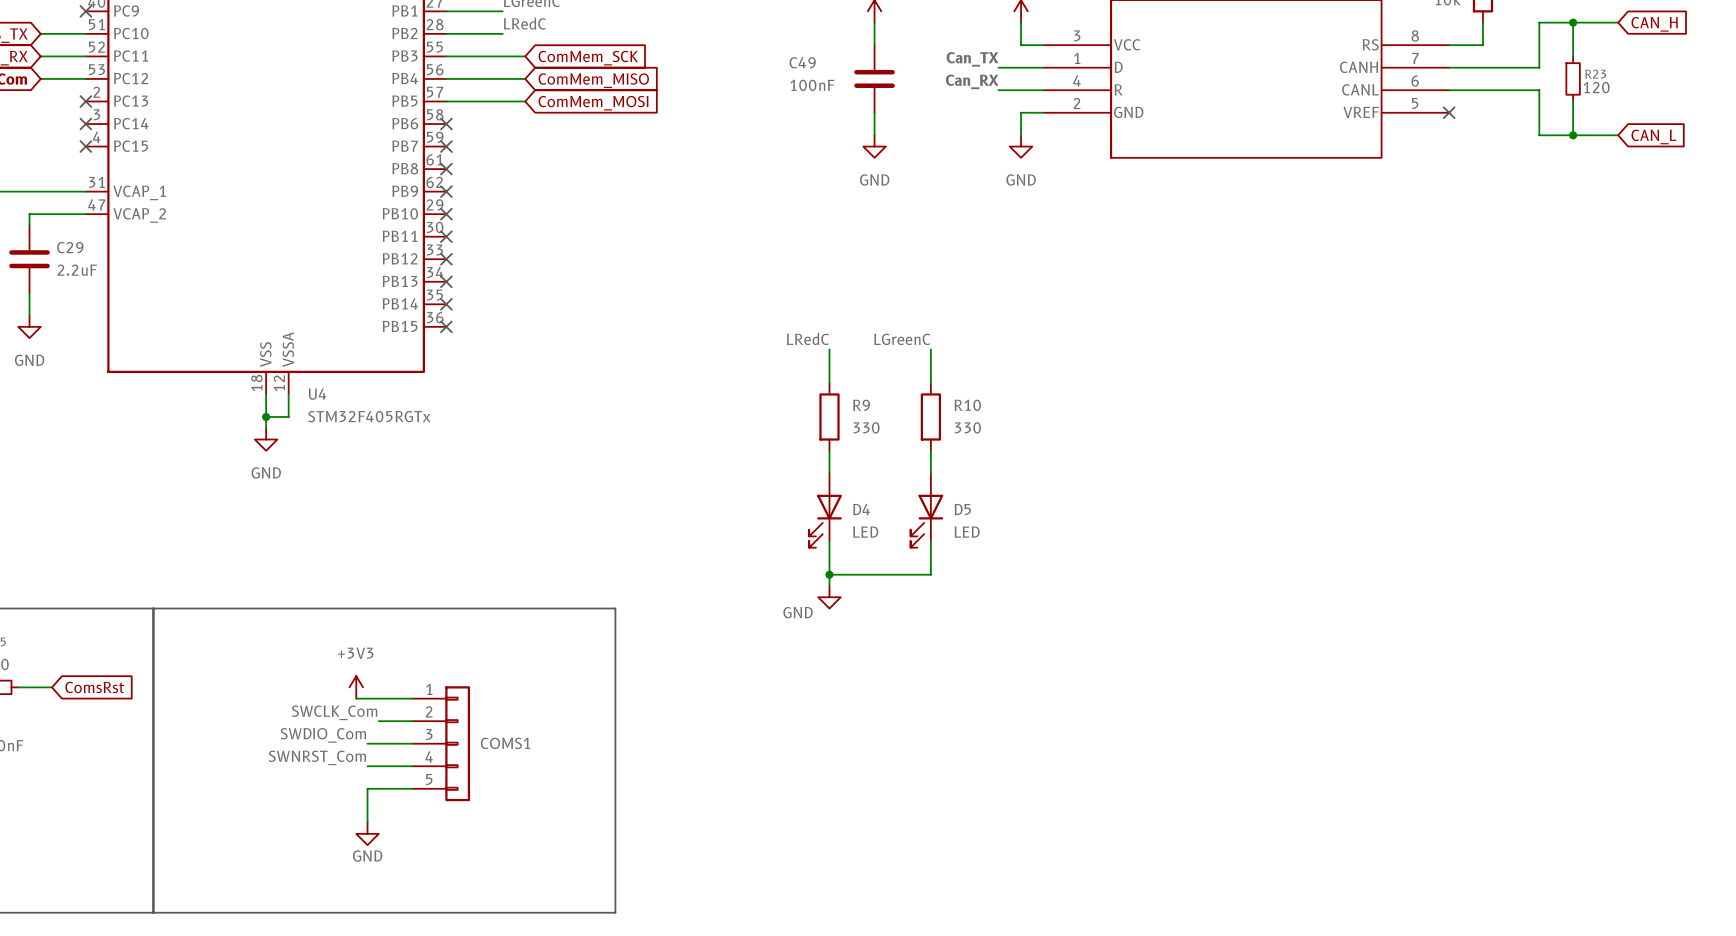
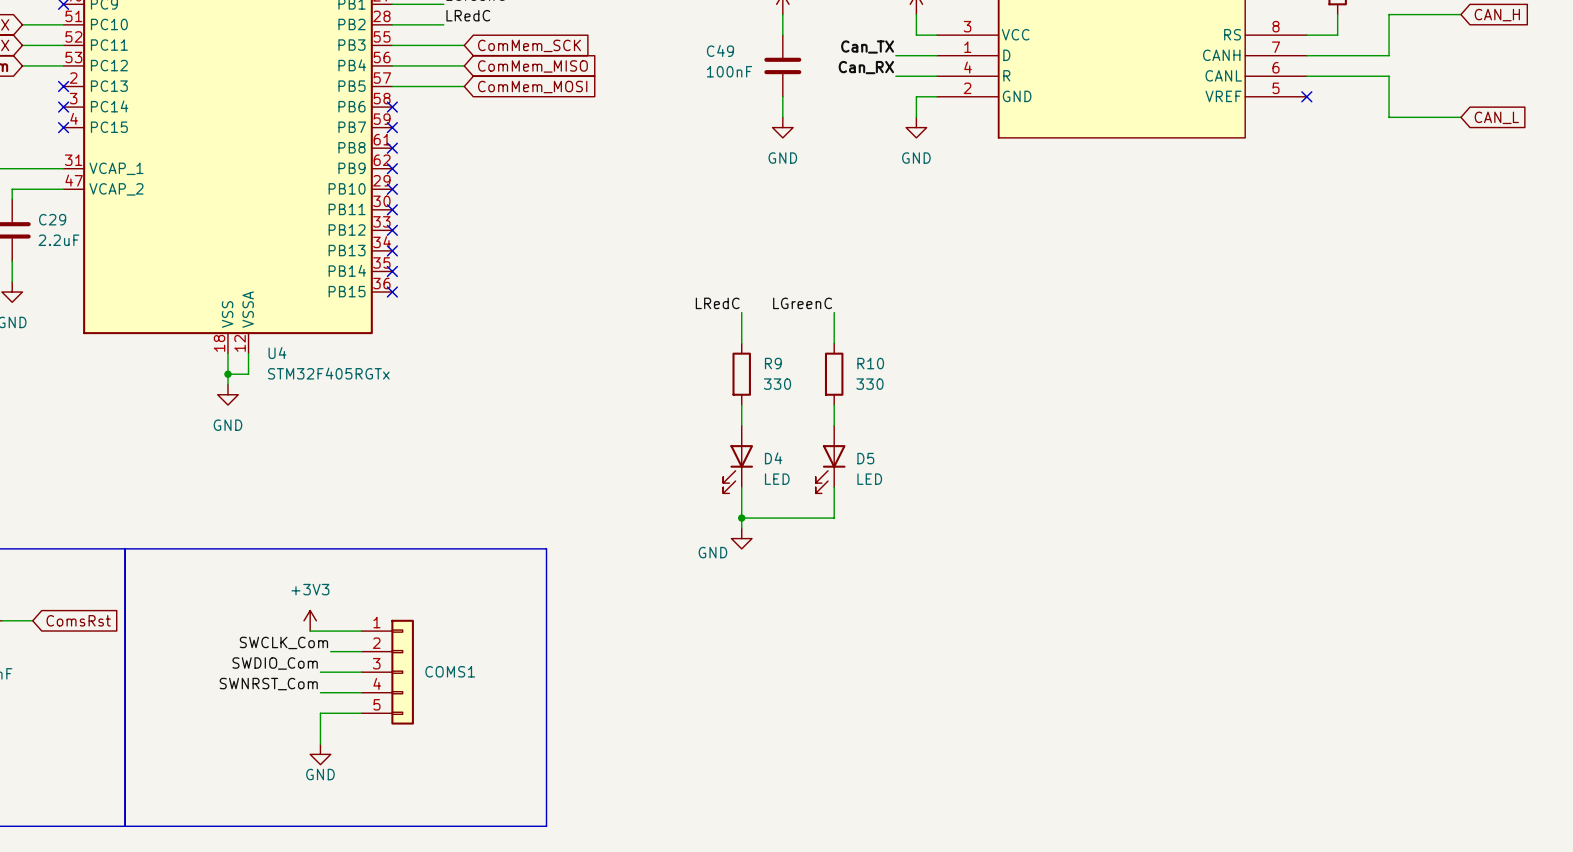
wire: (1573, 22) (1573, 56) -> none
junction: (1573, 22) -> none
R23: 120 (1573, 78) -> none
wire: (1573, 101) (1573, 135) -> none
junction: (1573, 135) -> none

